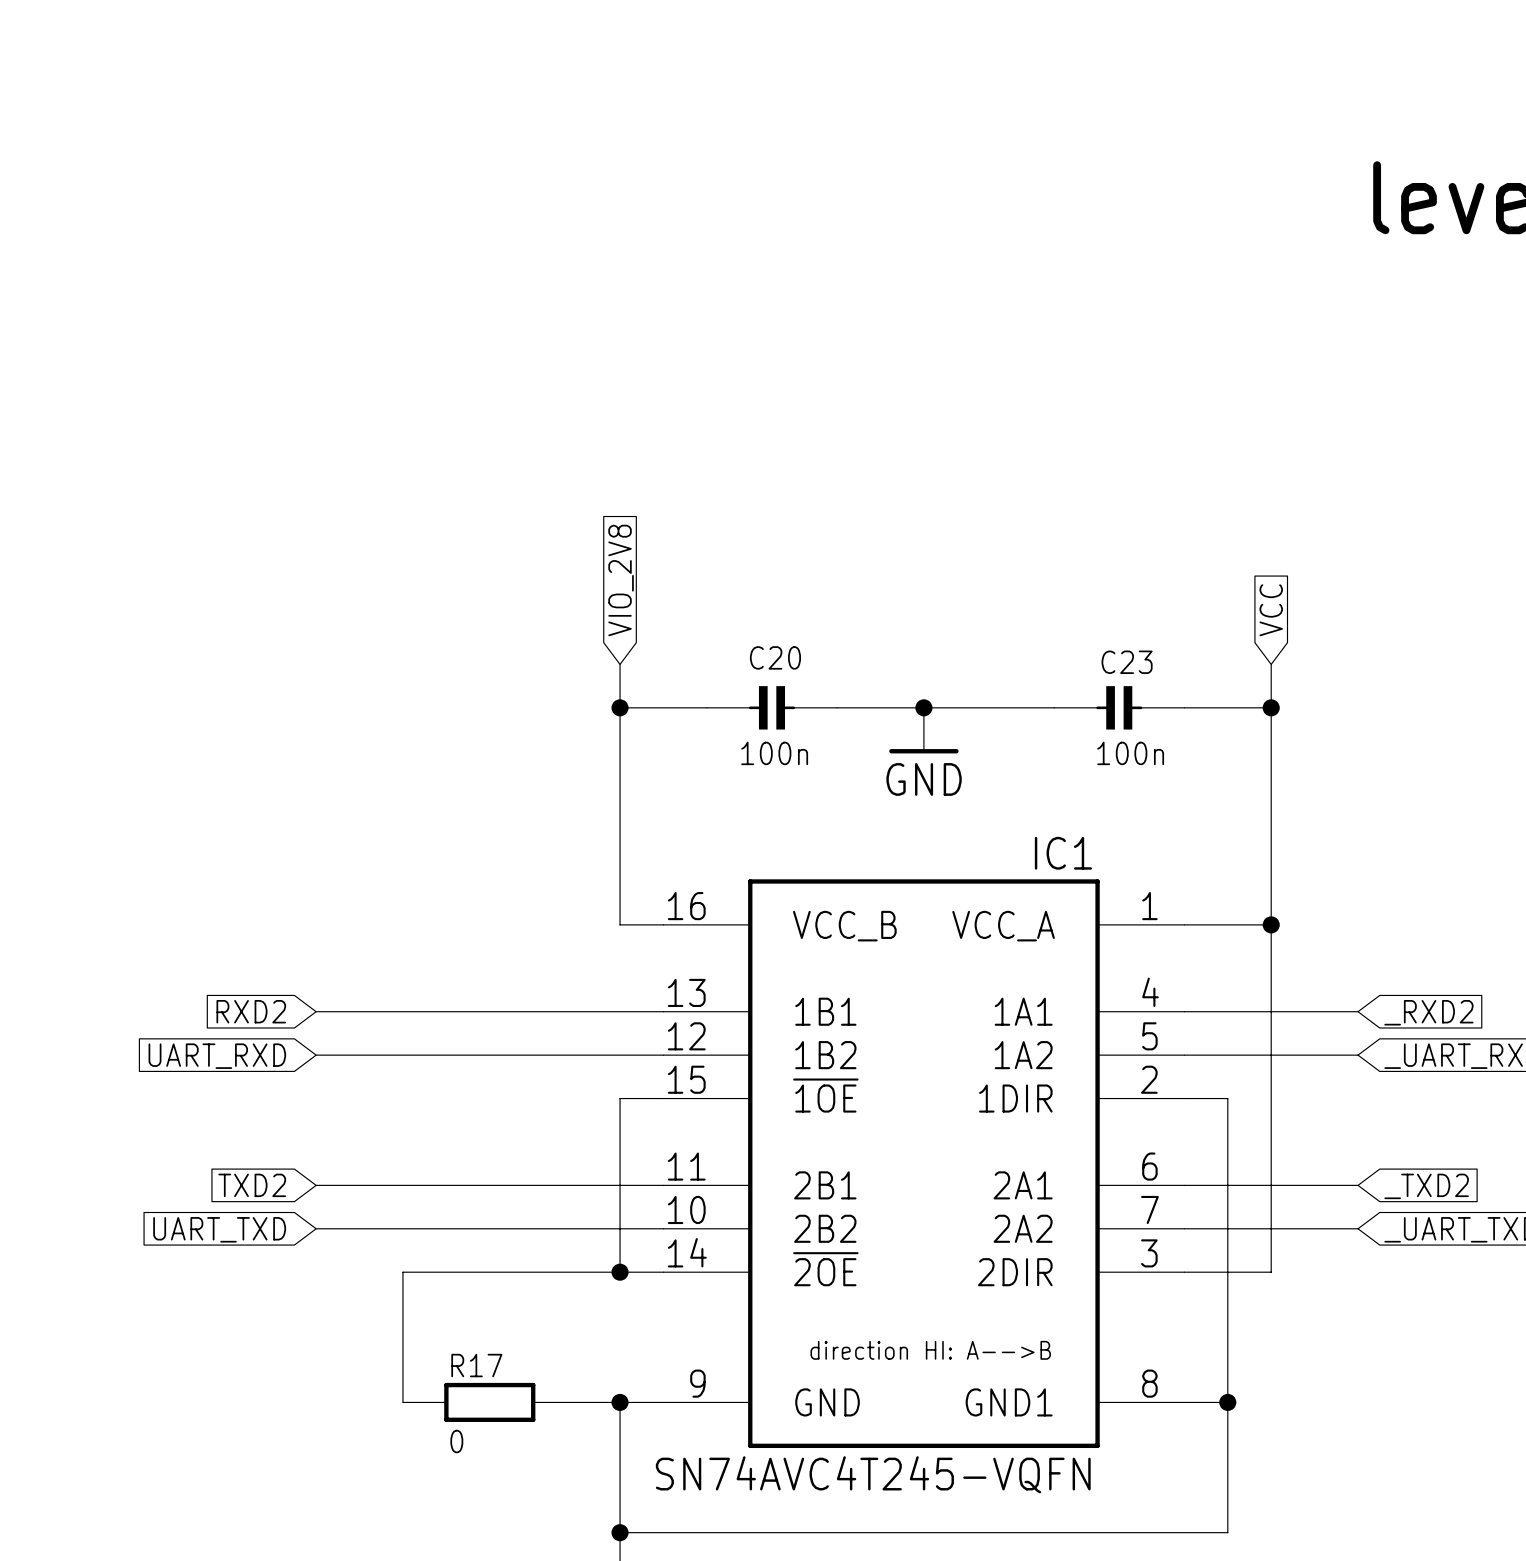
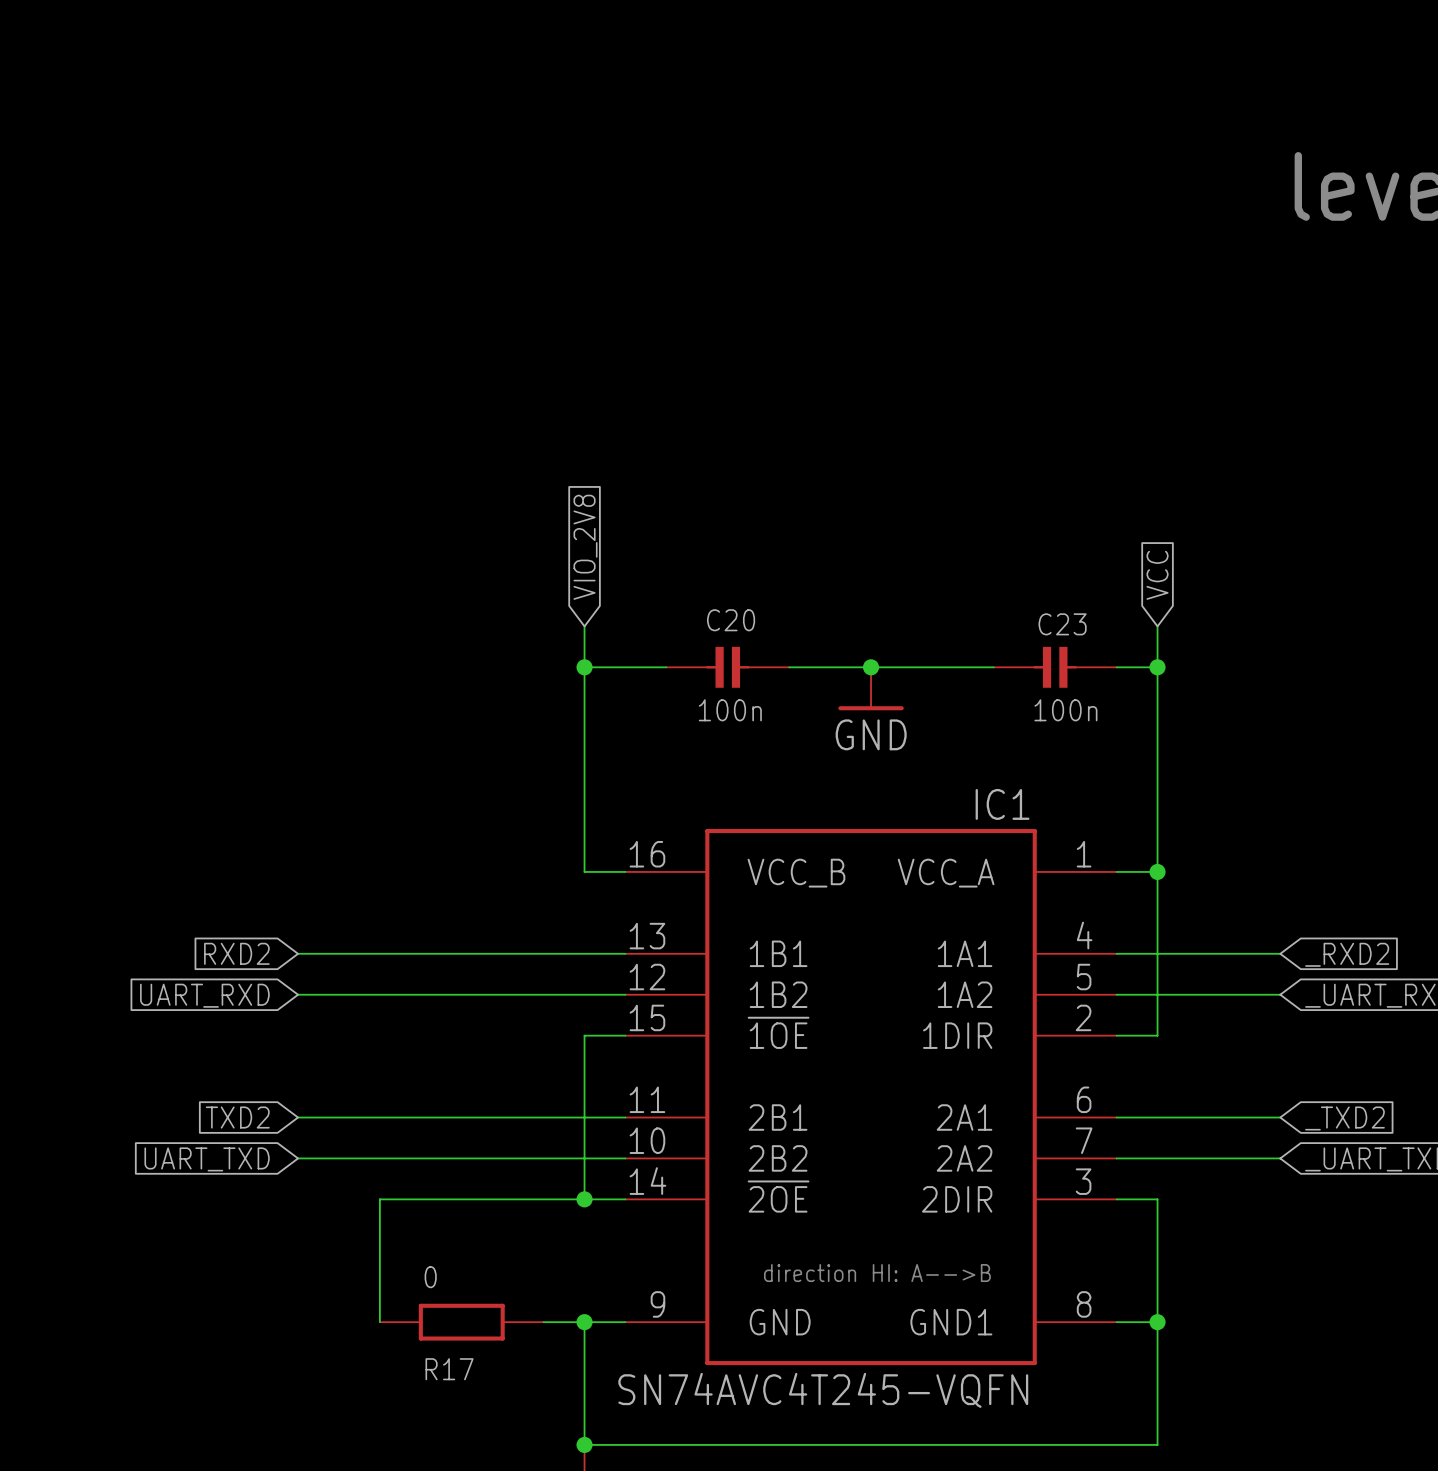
global label position: VCC (1271, 610) -> VCC (1157, 575)
wire: (1271, 664) (1271, 1272) (1227, 1272) (1227, 1098) -> (1157, 626) (1157, 1035)
wire: (1227, 707) (1271, 707) -> none
junction position: (1271, 707) -> (1157, 667)
wire: (1227, 924) (1271, 924) -> none
junction position: (1271, 924) -> (1157, 871)
R17 name position: R17 (476, 1365) -> R17 (449, 1369)
R17 value position: 0 (456, 1441) -> 0 (430, 1277)

